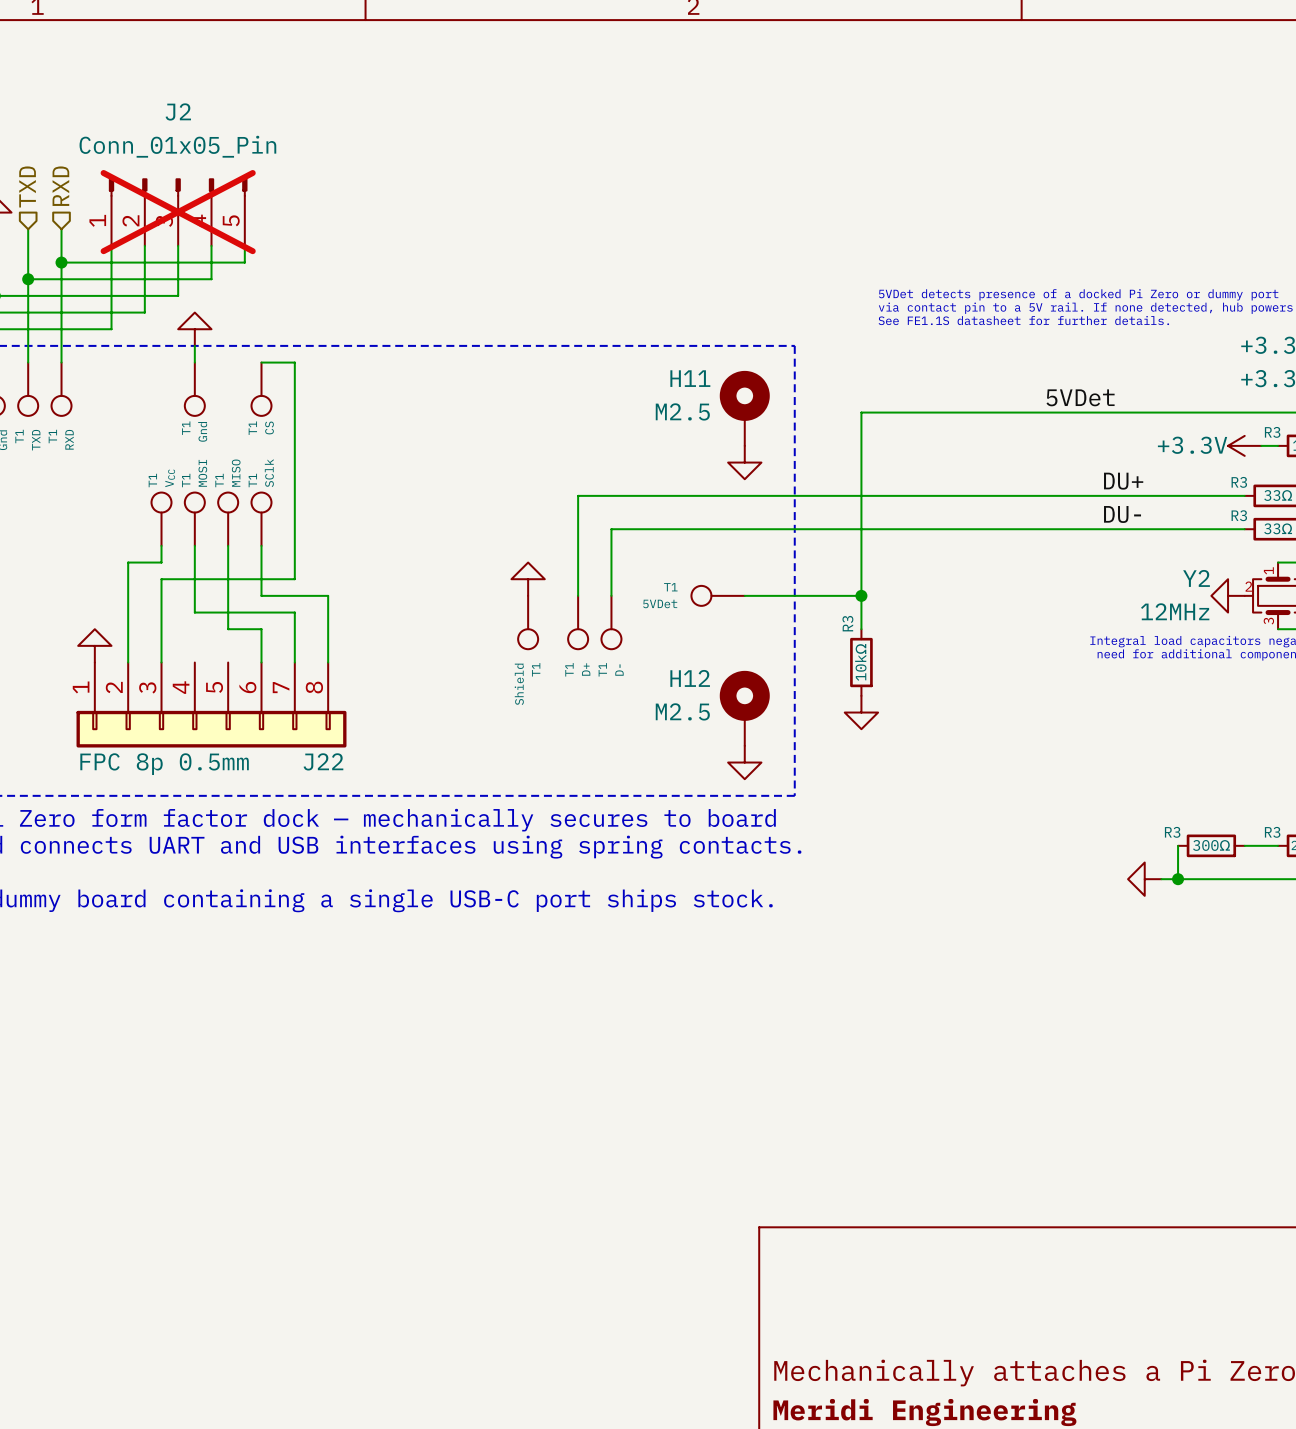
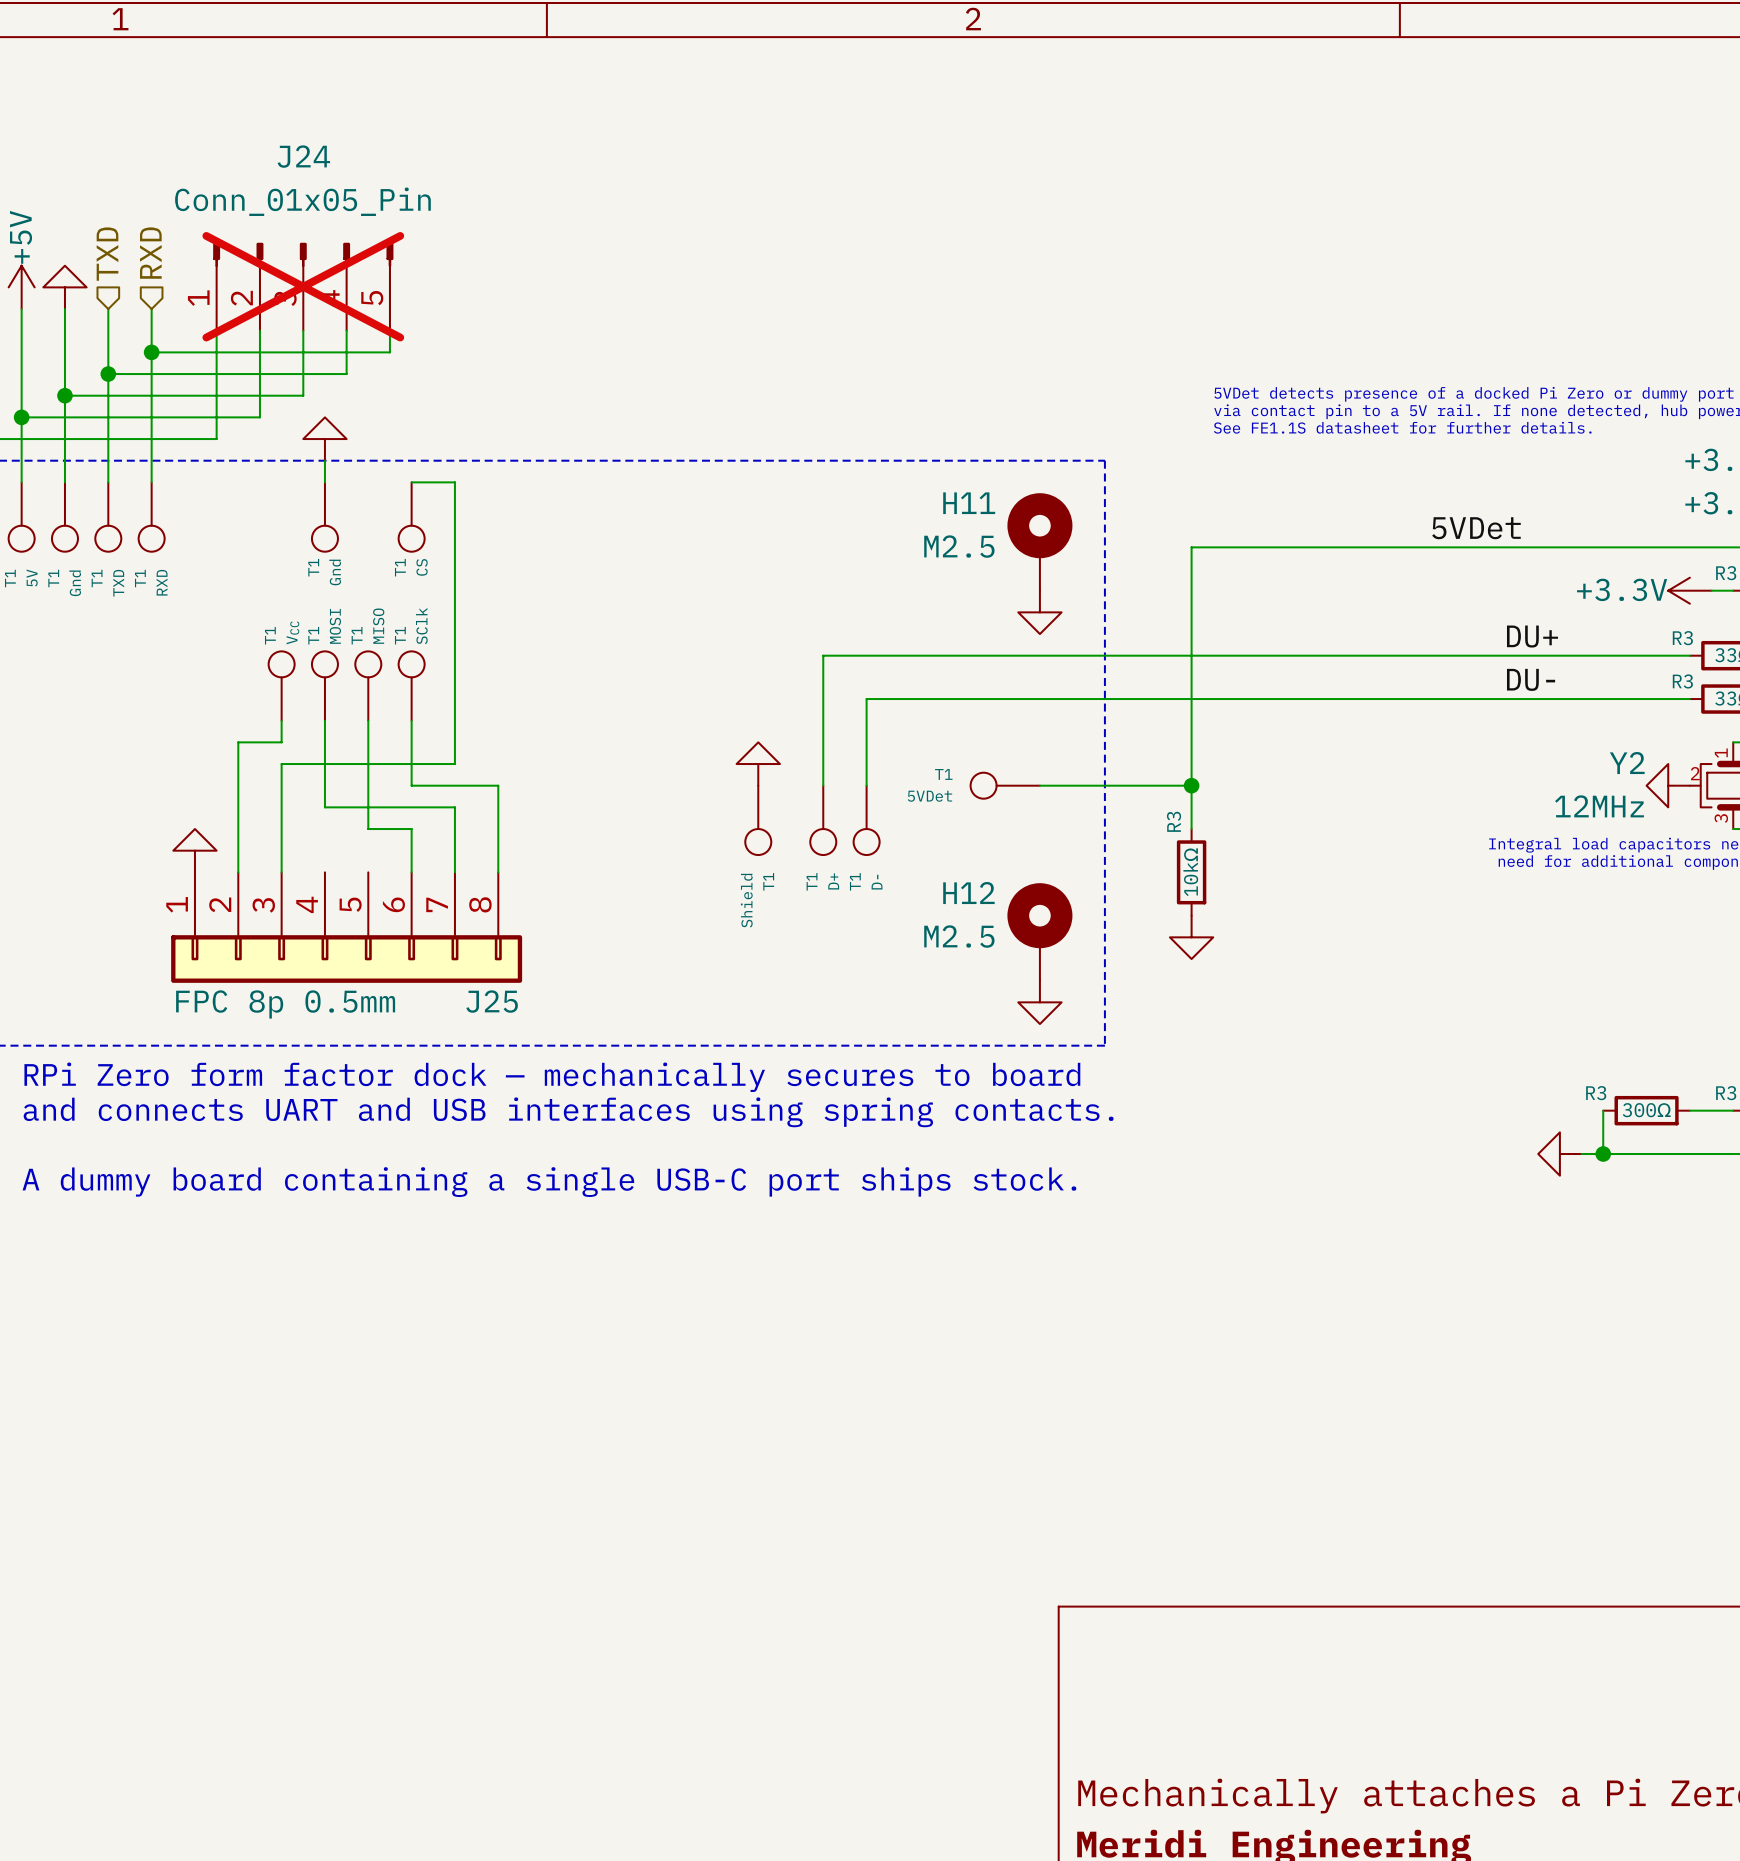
J2 name: J2 (178, 111) -> J24 (303, 156)
J22 name: J22 (323, 761) -> J25 (492, 1001)

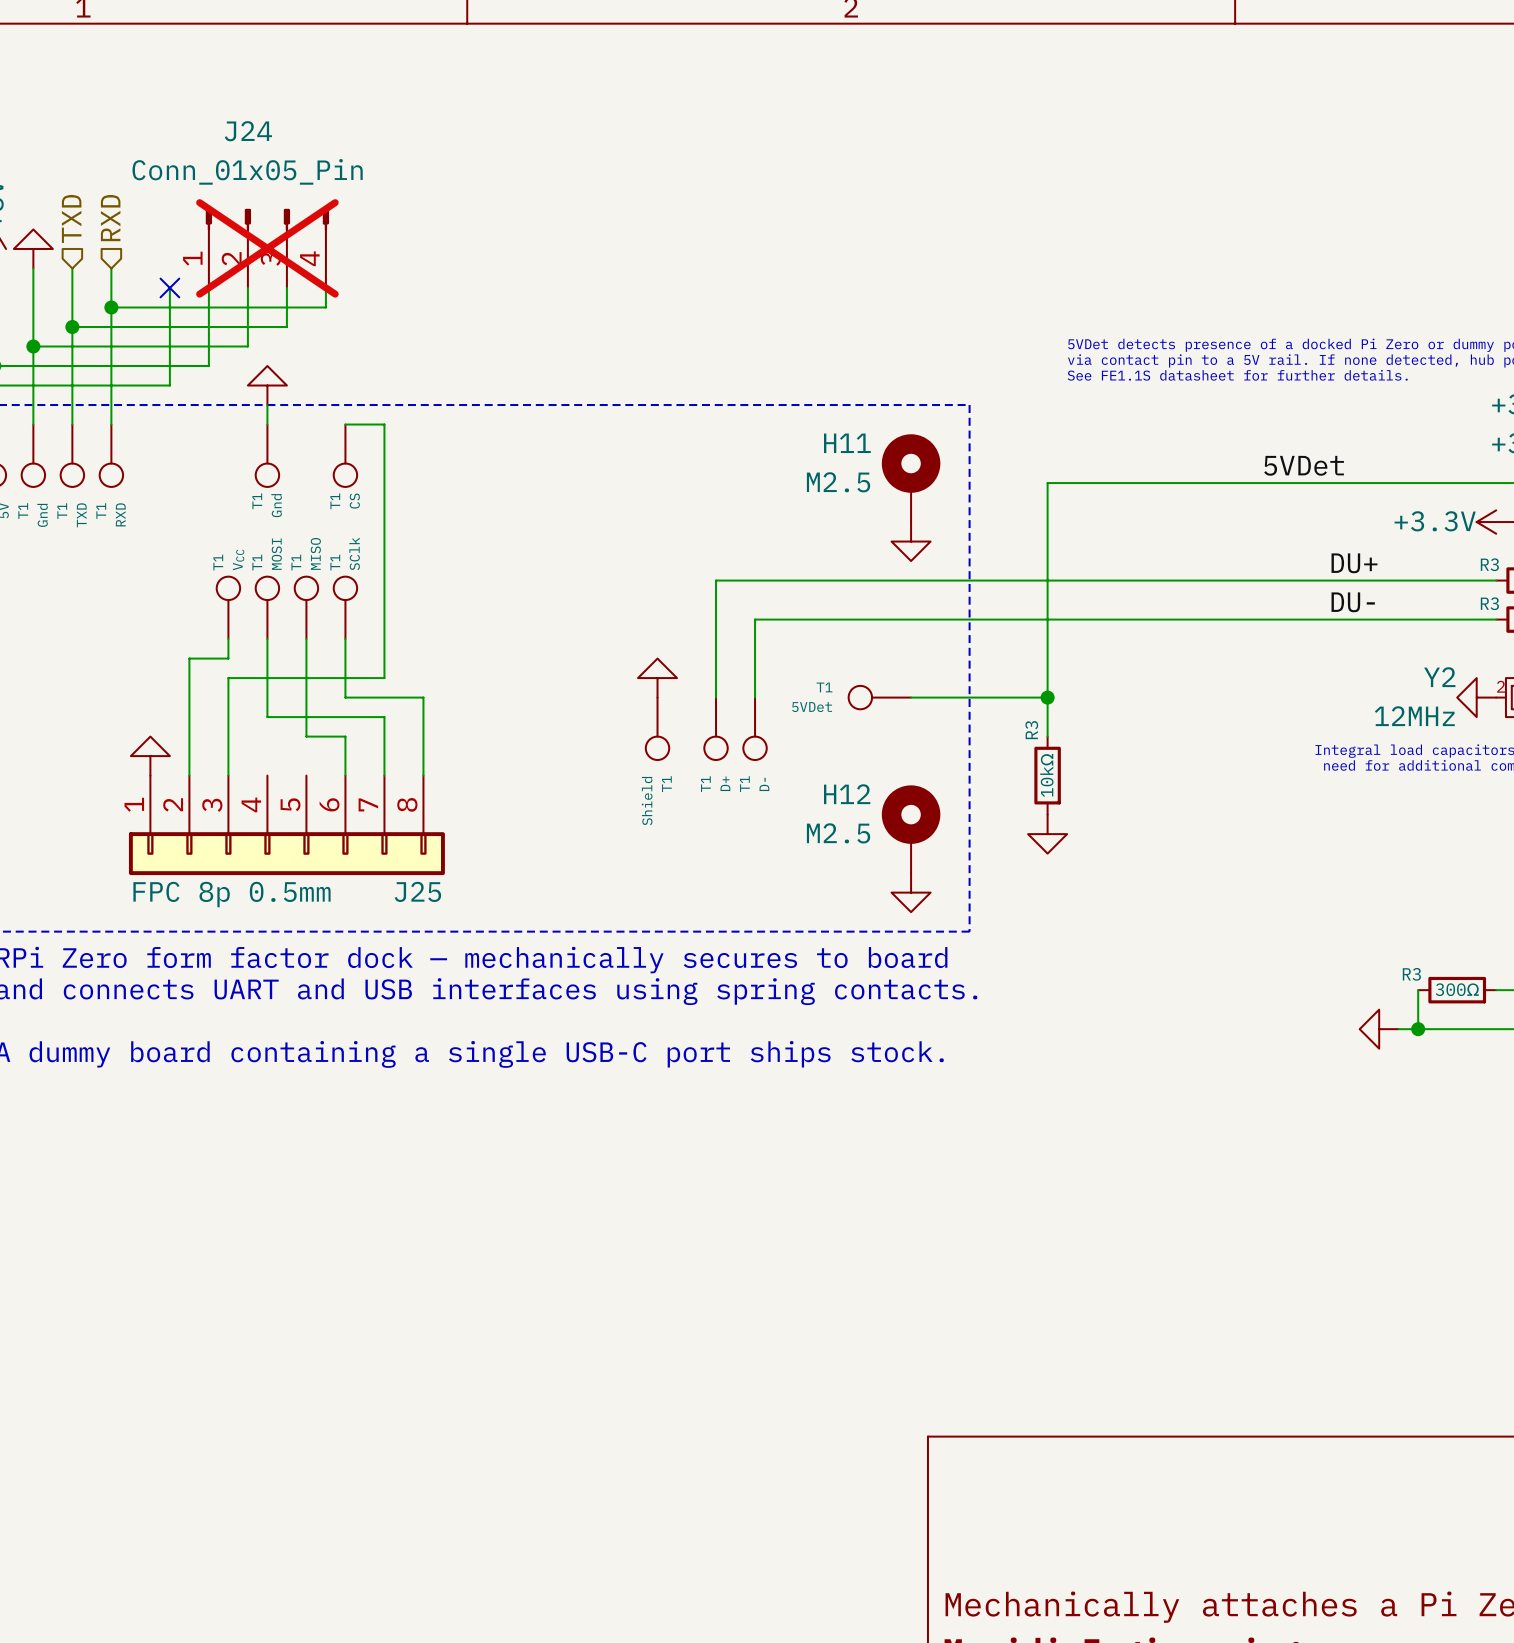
J24 symbol: [213, 242, 394, 331] -> [205, 208, 330, 288]
no-connect mark: none -> (169, 287)

